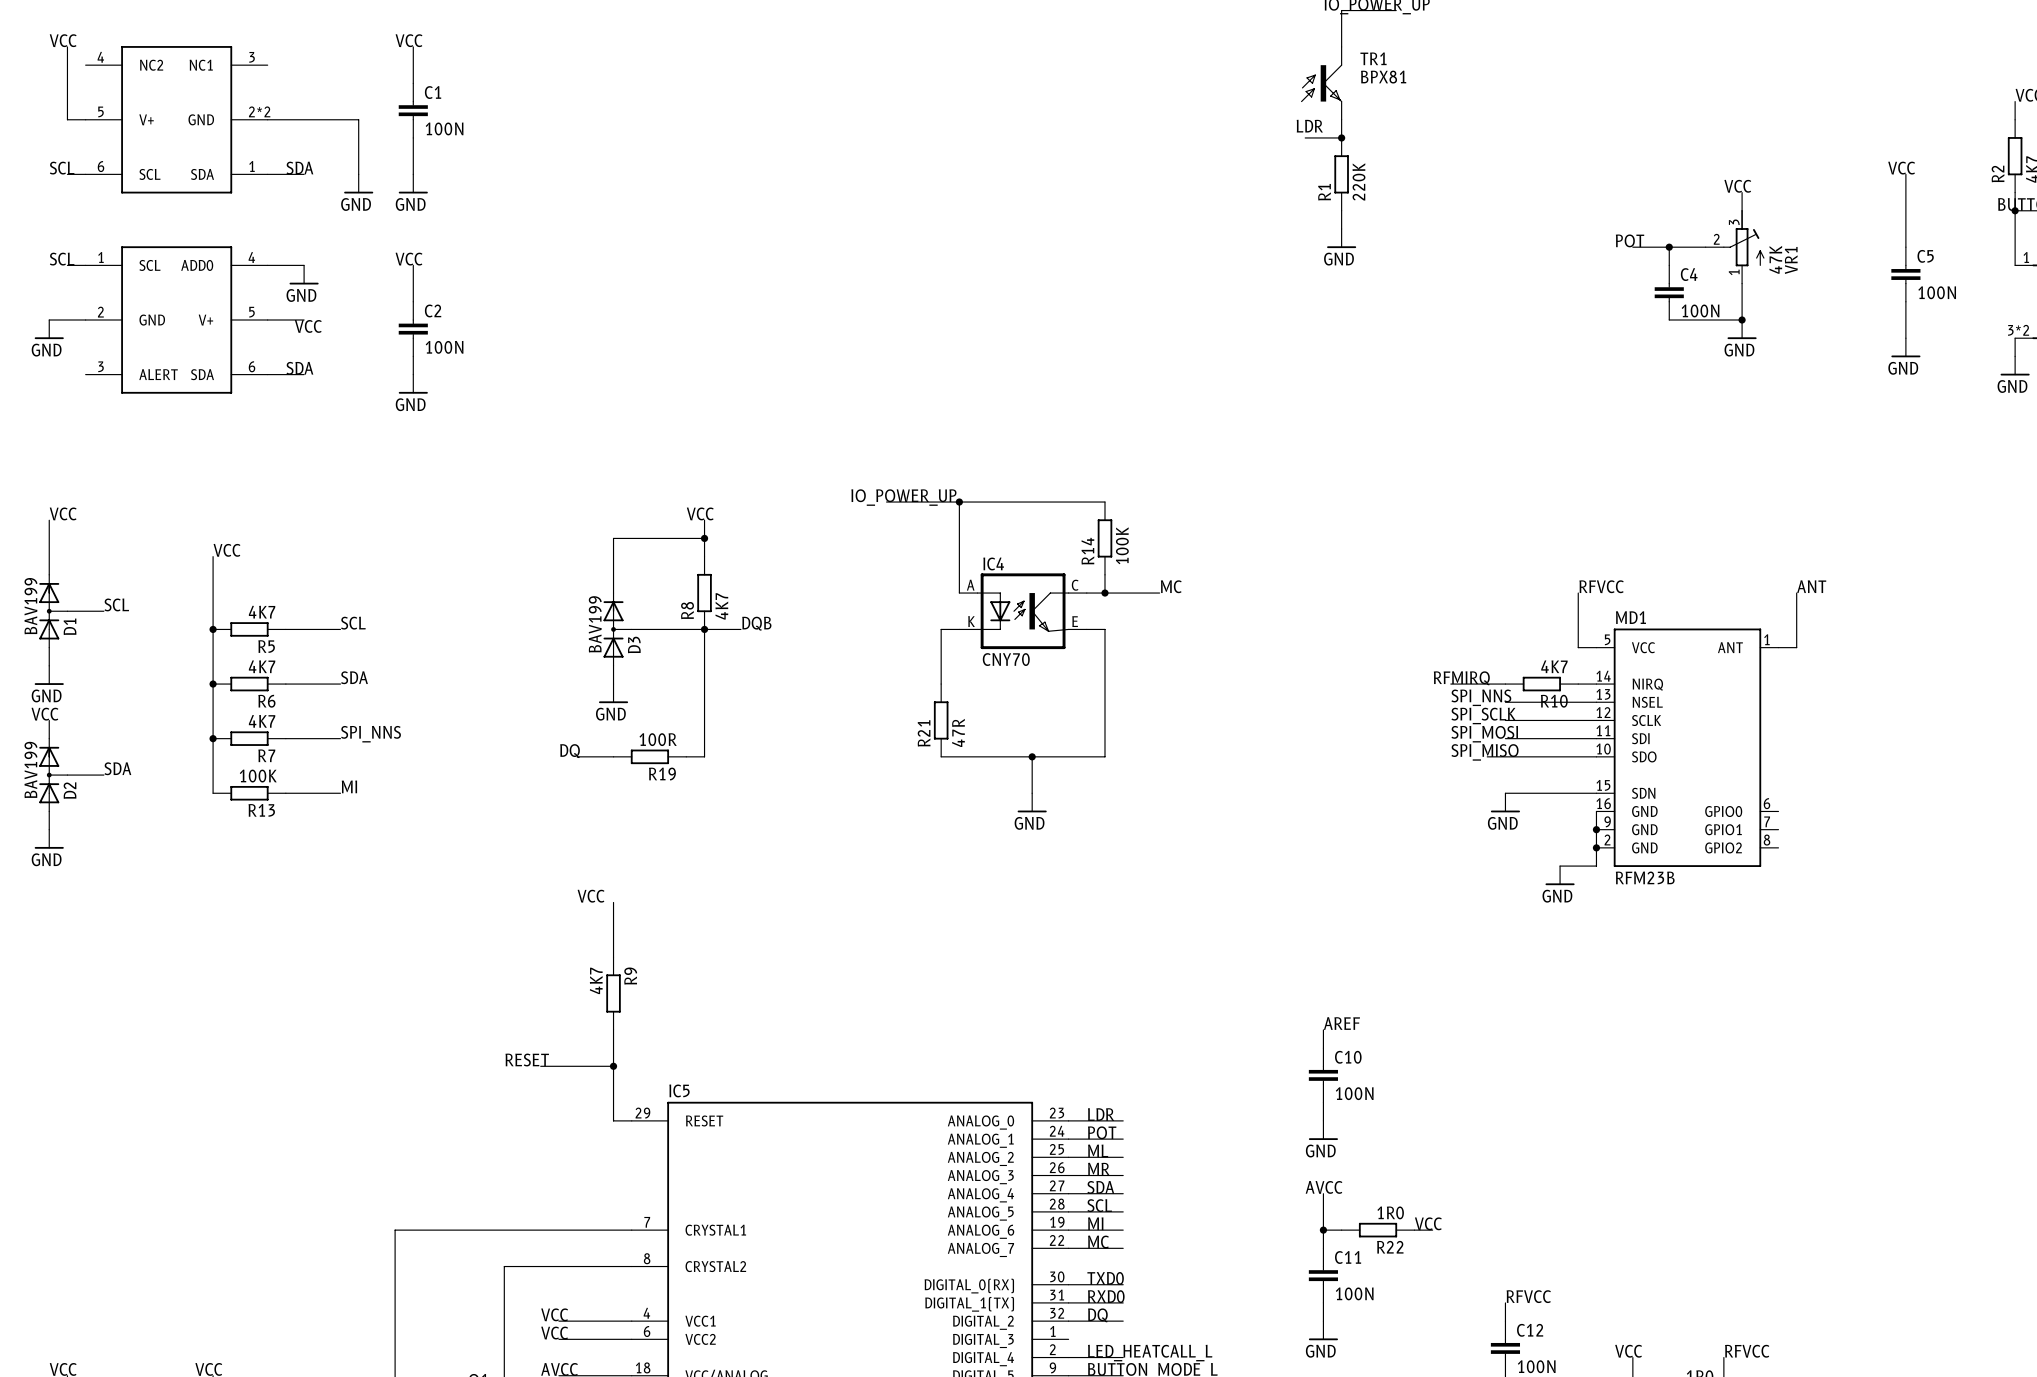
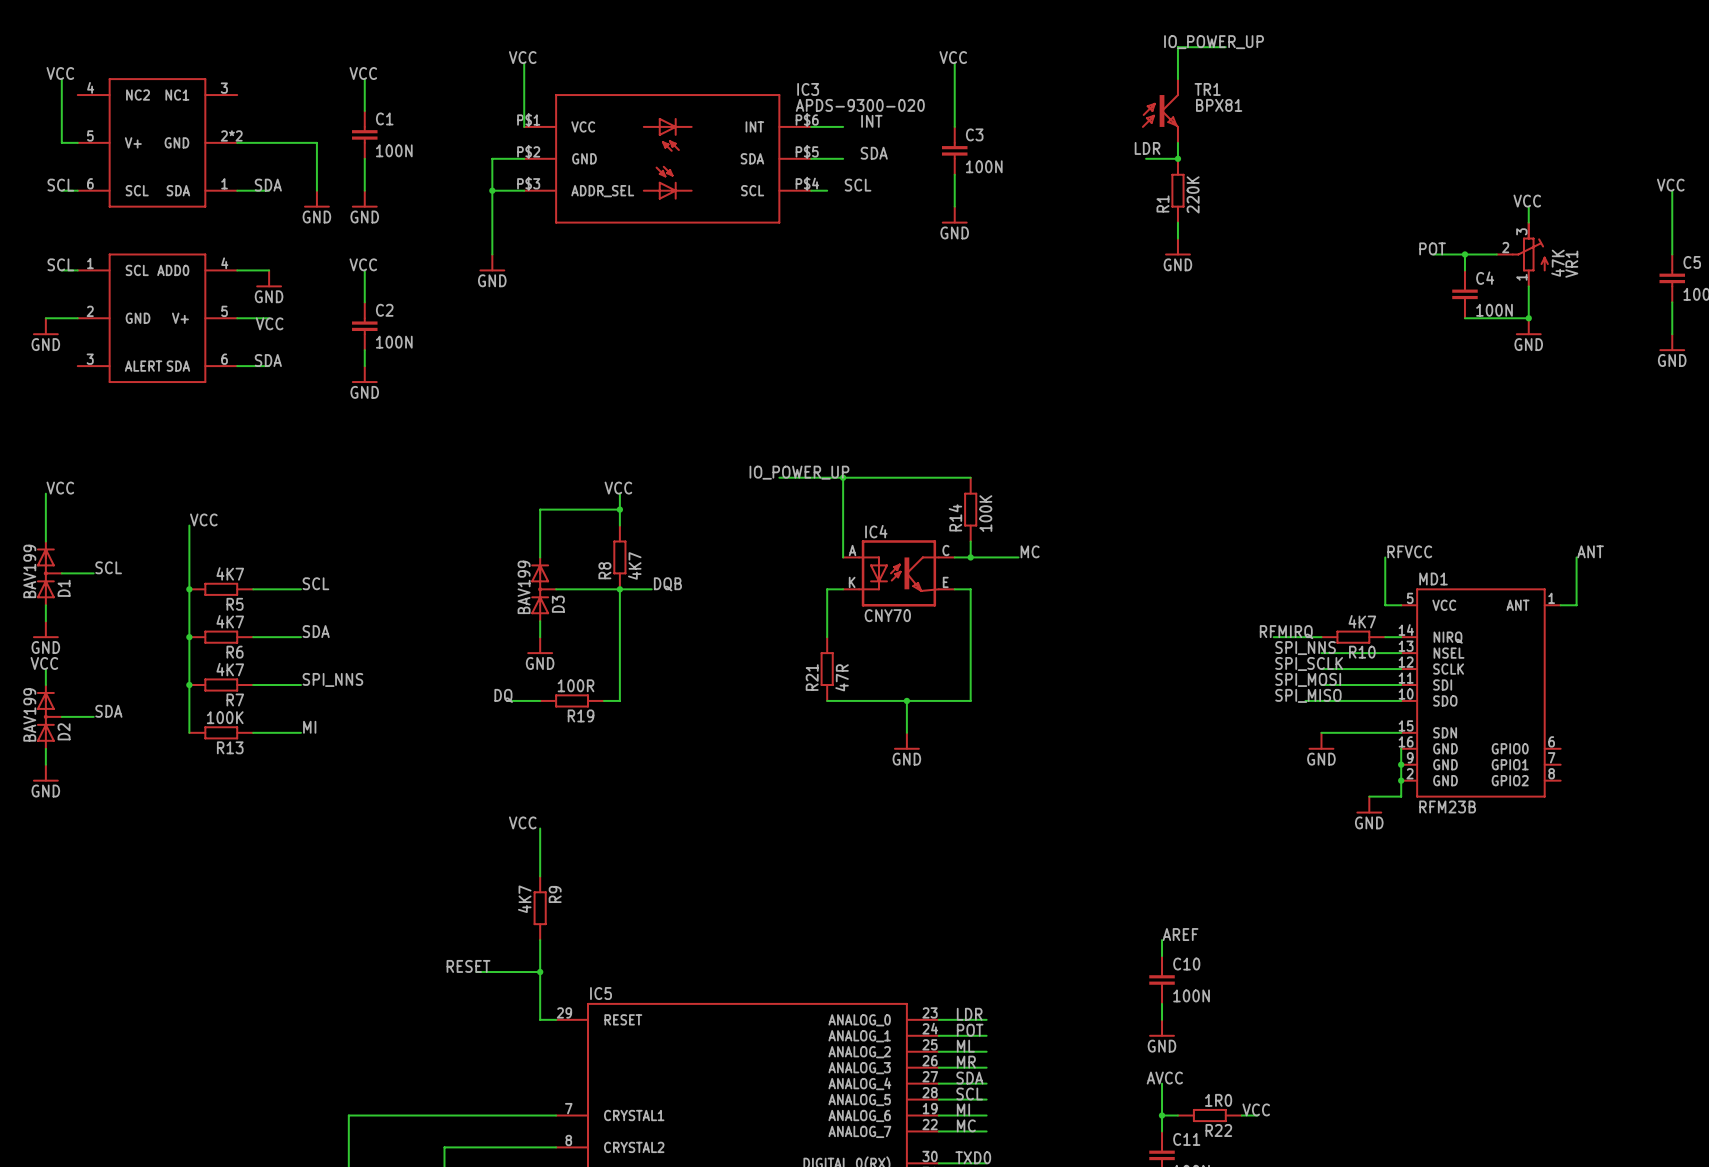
label: none -> VCC (522, 57)
label: none -> VCC (953, 57)
wire: none -> (524, 63) (524, 126)
wire: none -> (954, 63) (954, 126)
label: none -> INT (871, 121)
wire: none -> (811, 126) (843, 126)
C3: none -> 100N (954, 150)
label: none -> SDA (874, 153)
wire: none -> (524, 158) (492, 158) (492, 254)
IC3: none -> APDS-9300-020 (667, 158)
wire: none -> (811, 158) (843, 158)
wire: none -> (954, 174) (954, 206)
label: none -> SCL (858, 185)
wire: none -> (492, 190) (524, 190)
junction: none -> (492, 190)
wire: none -> (811, 190) (827, 190)
power symbol: none -> GND (954, 215)
power symbol: none -> GND (492, 262)

